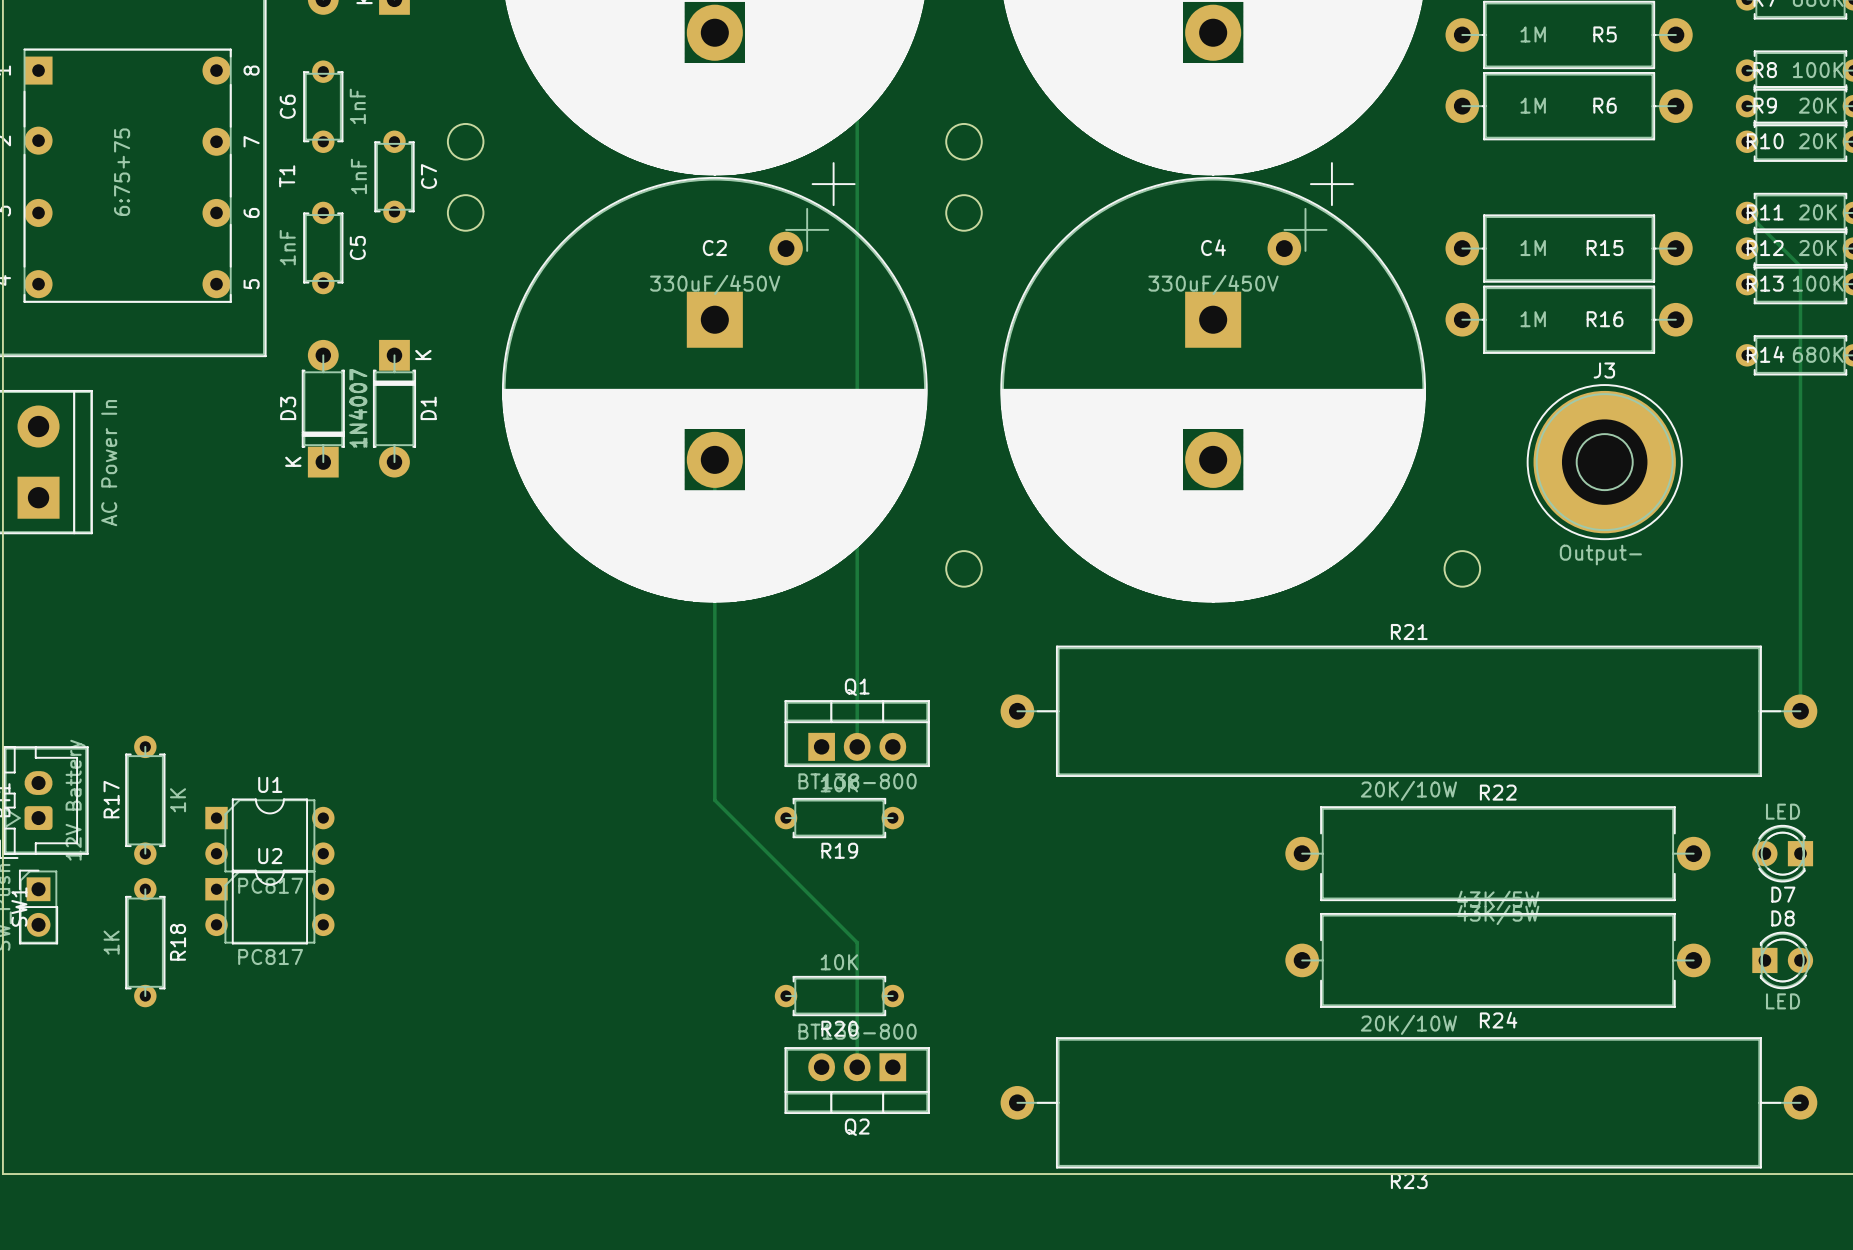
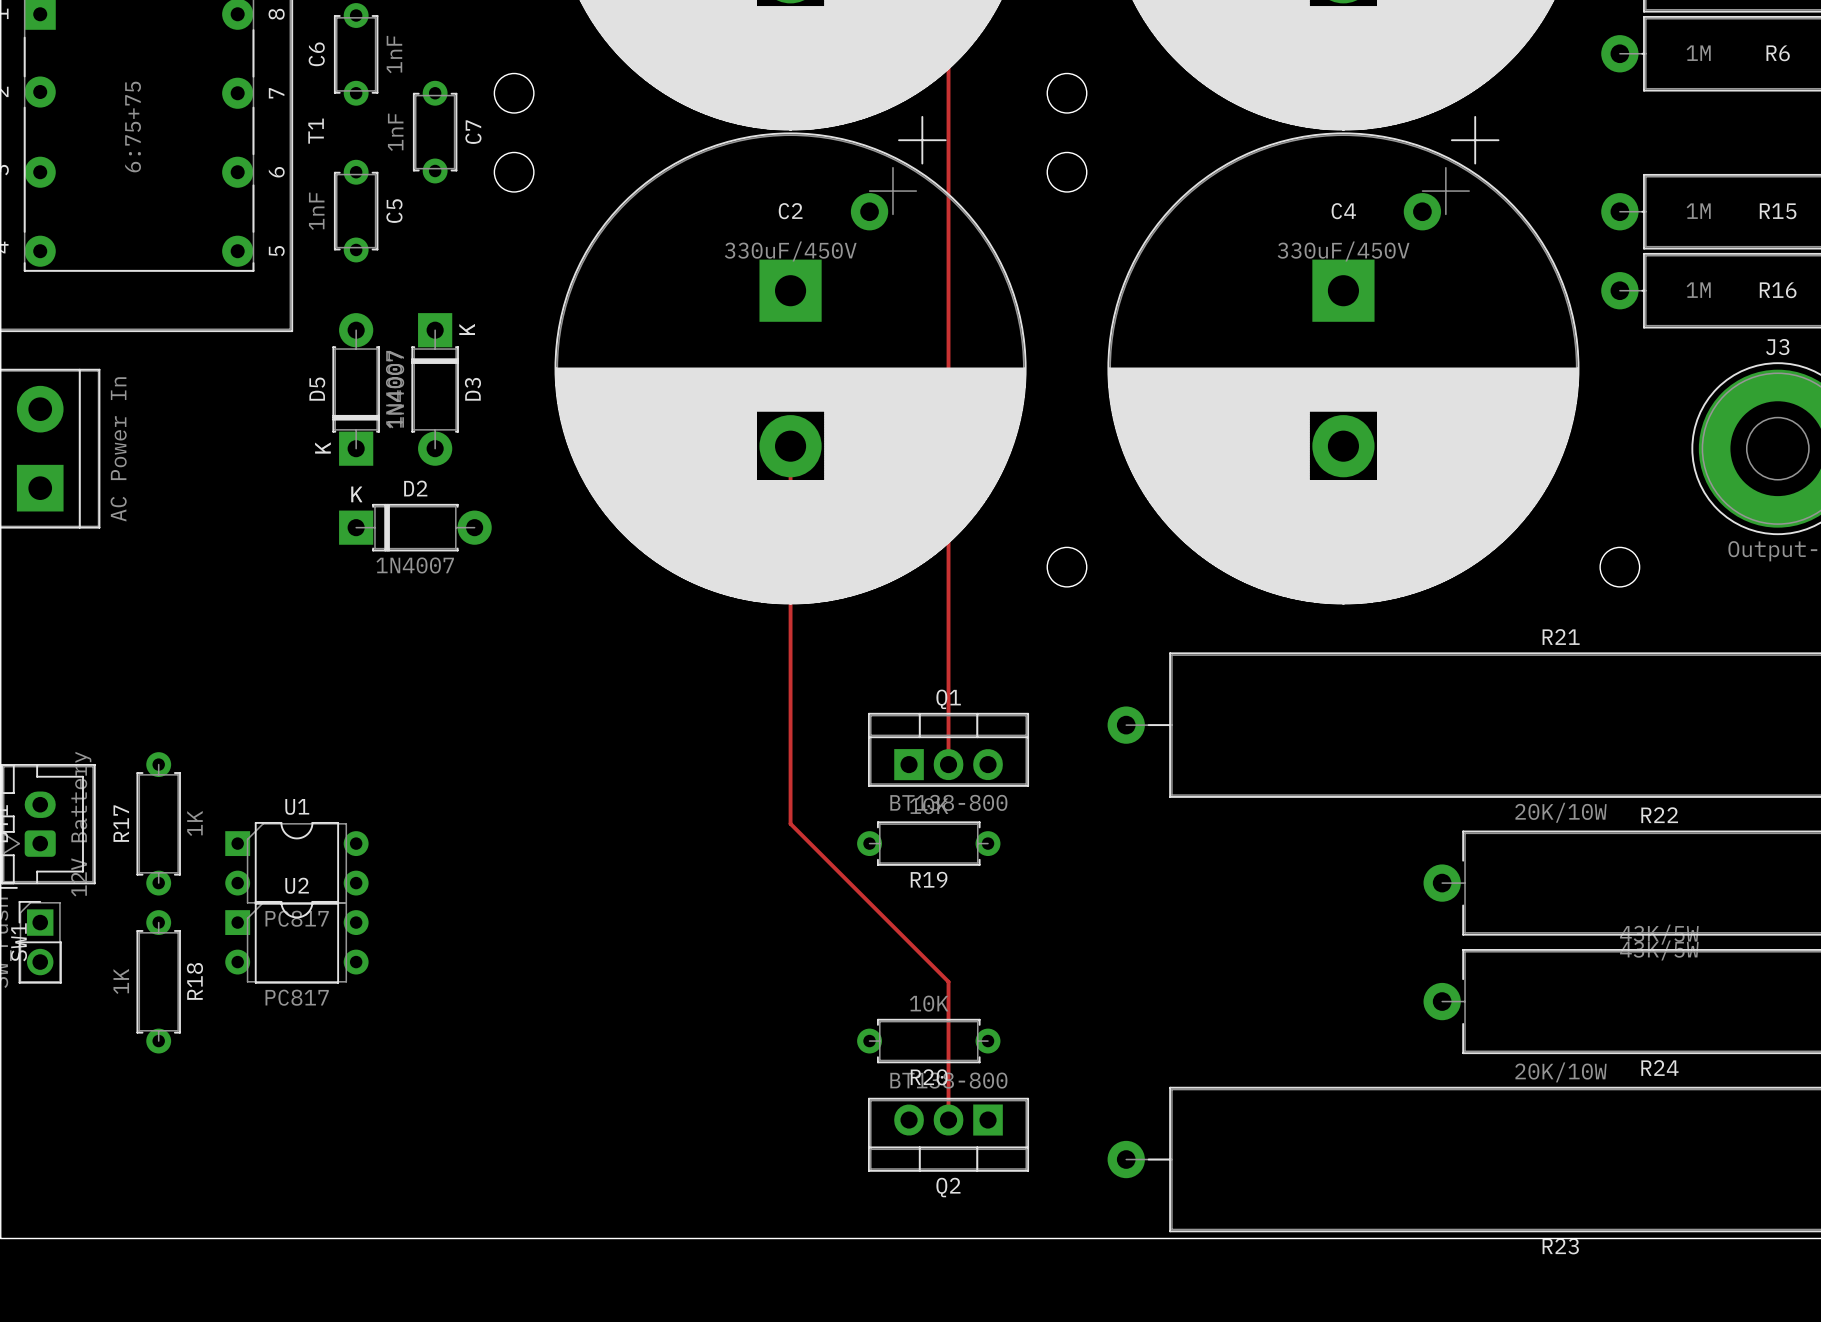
D3 name: D3 (288, 408) -> D5 (317, 389)
D1 name: D1 (428, 408) -> D3 (472, 389)
D2: none -> 1N4007 (415, 527)

